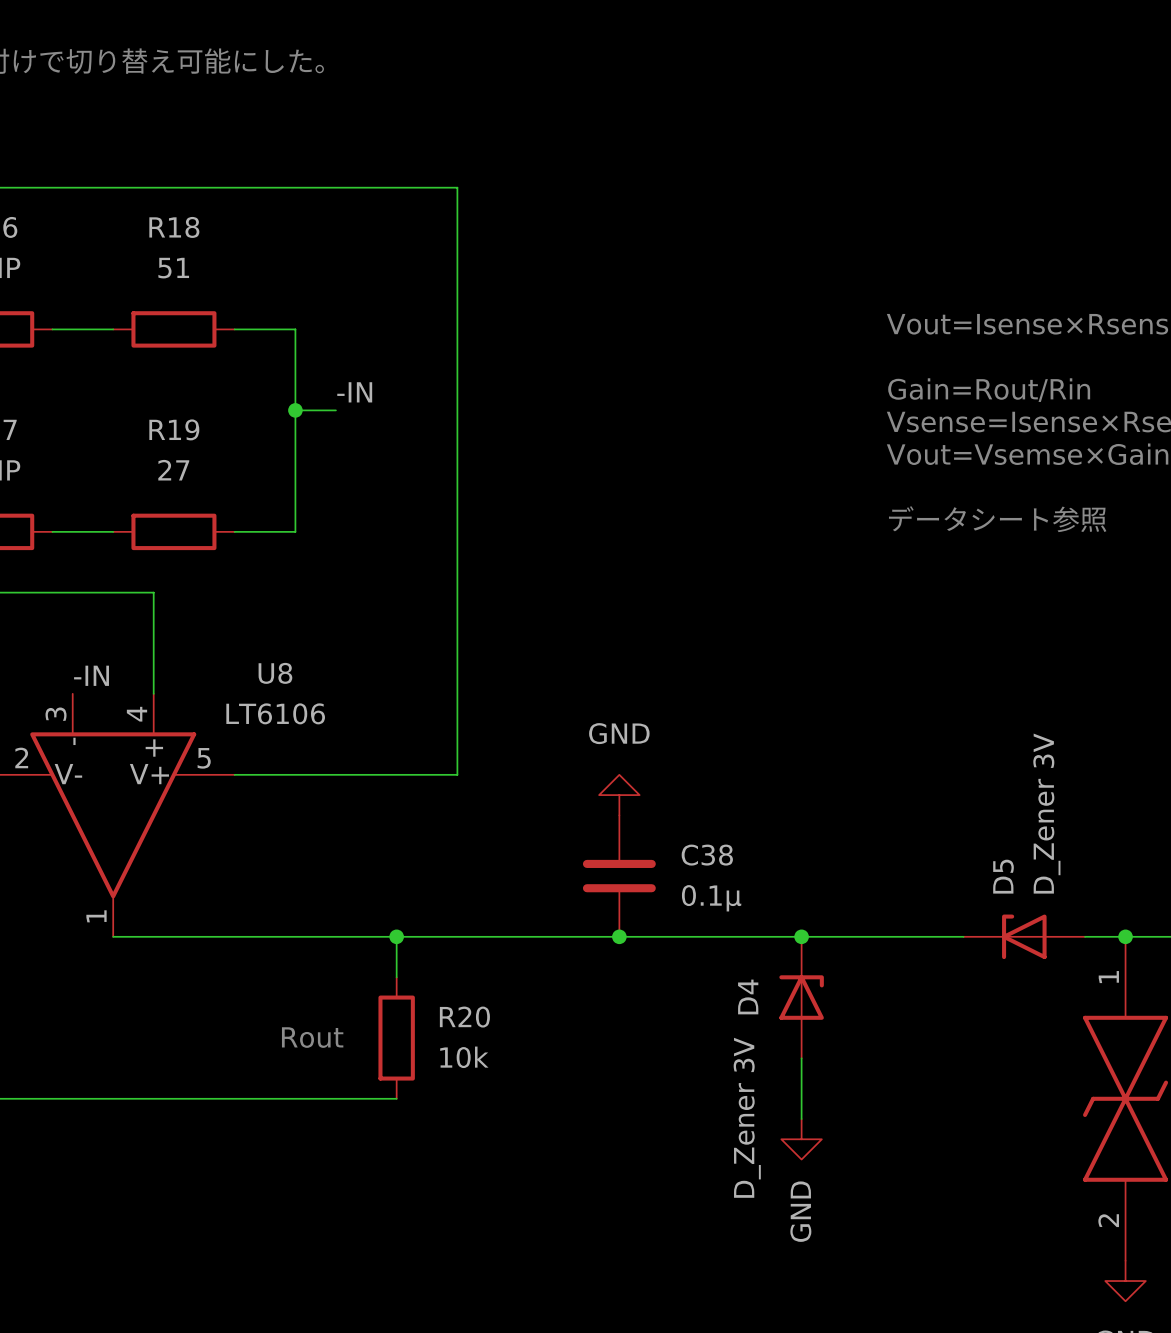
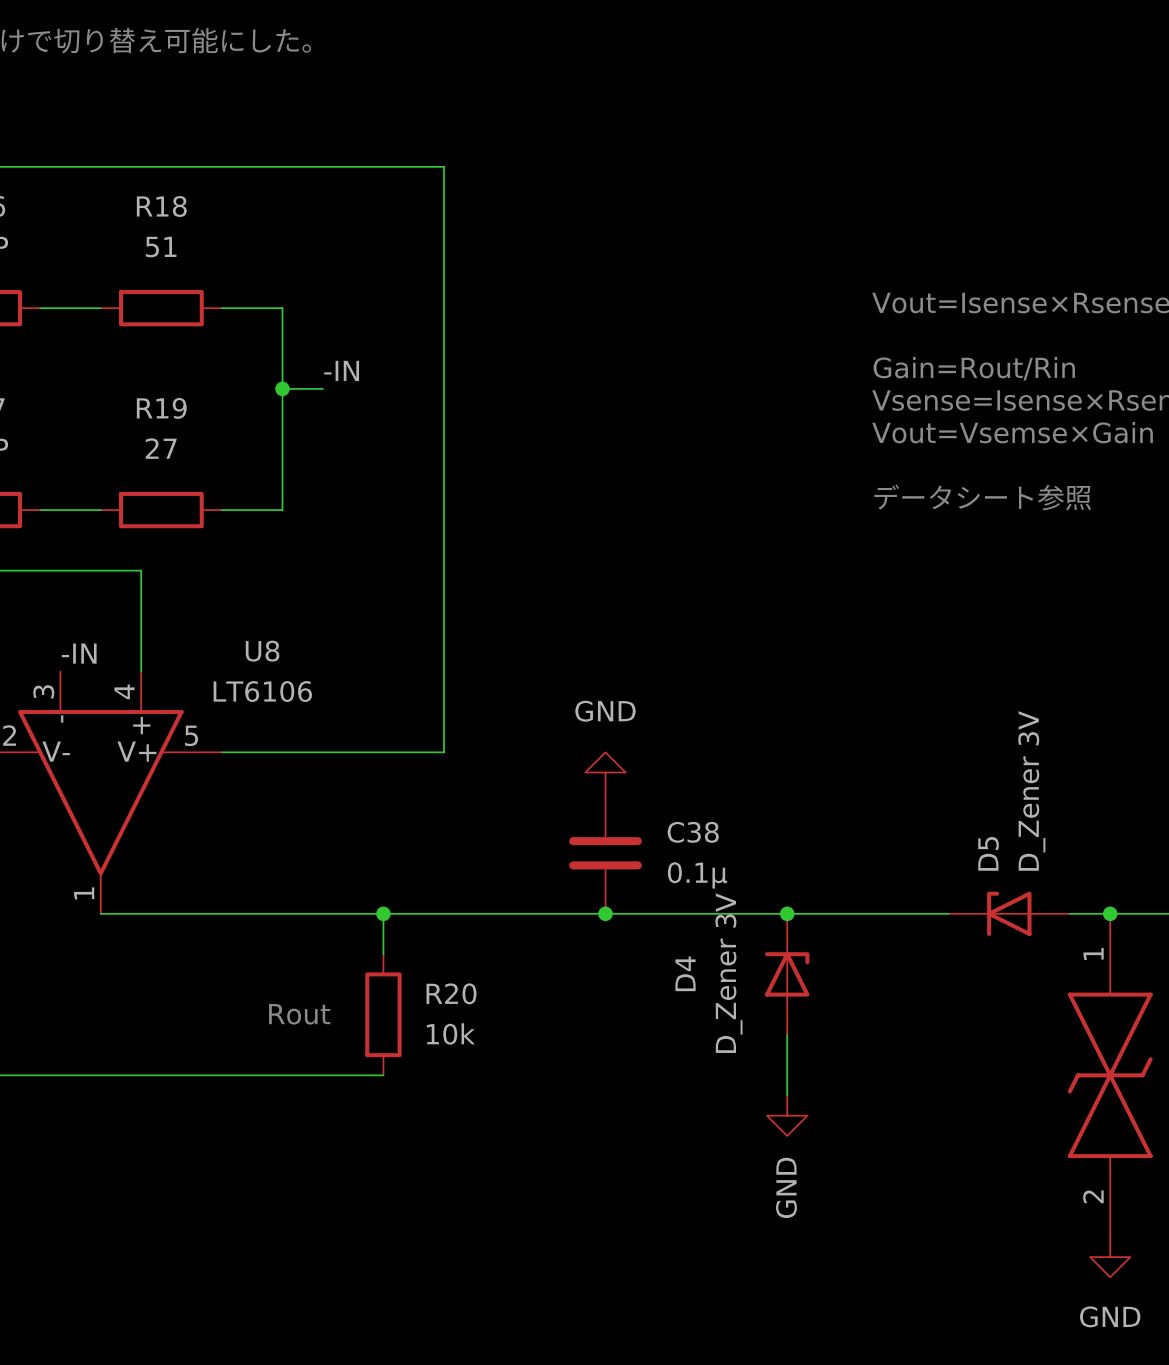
D4 name position: D4 (748, 996) -> D4 (685, 973)
D4 value position: D_Zener 3V (747, 1117) -> D_Zener 3V (728, 973)

